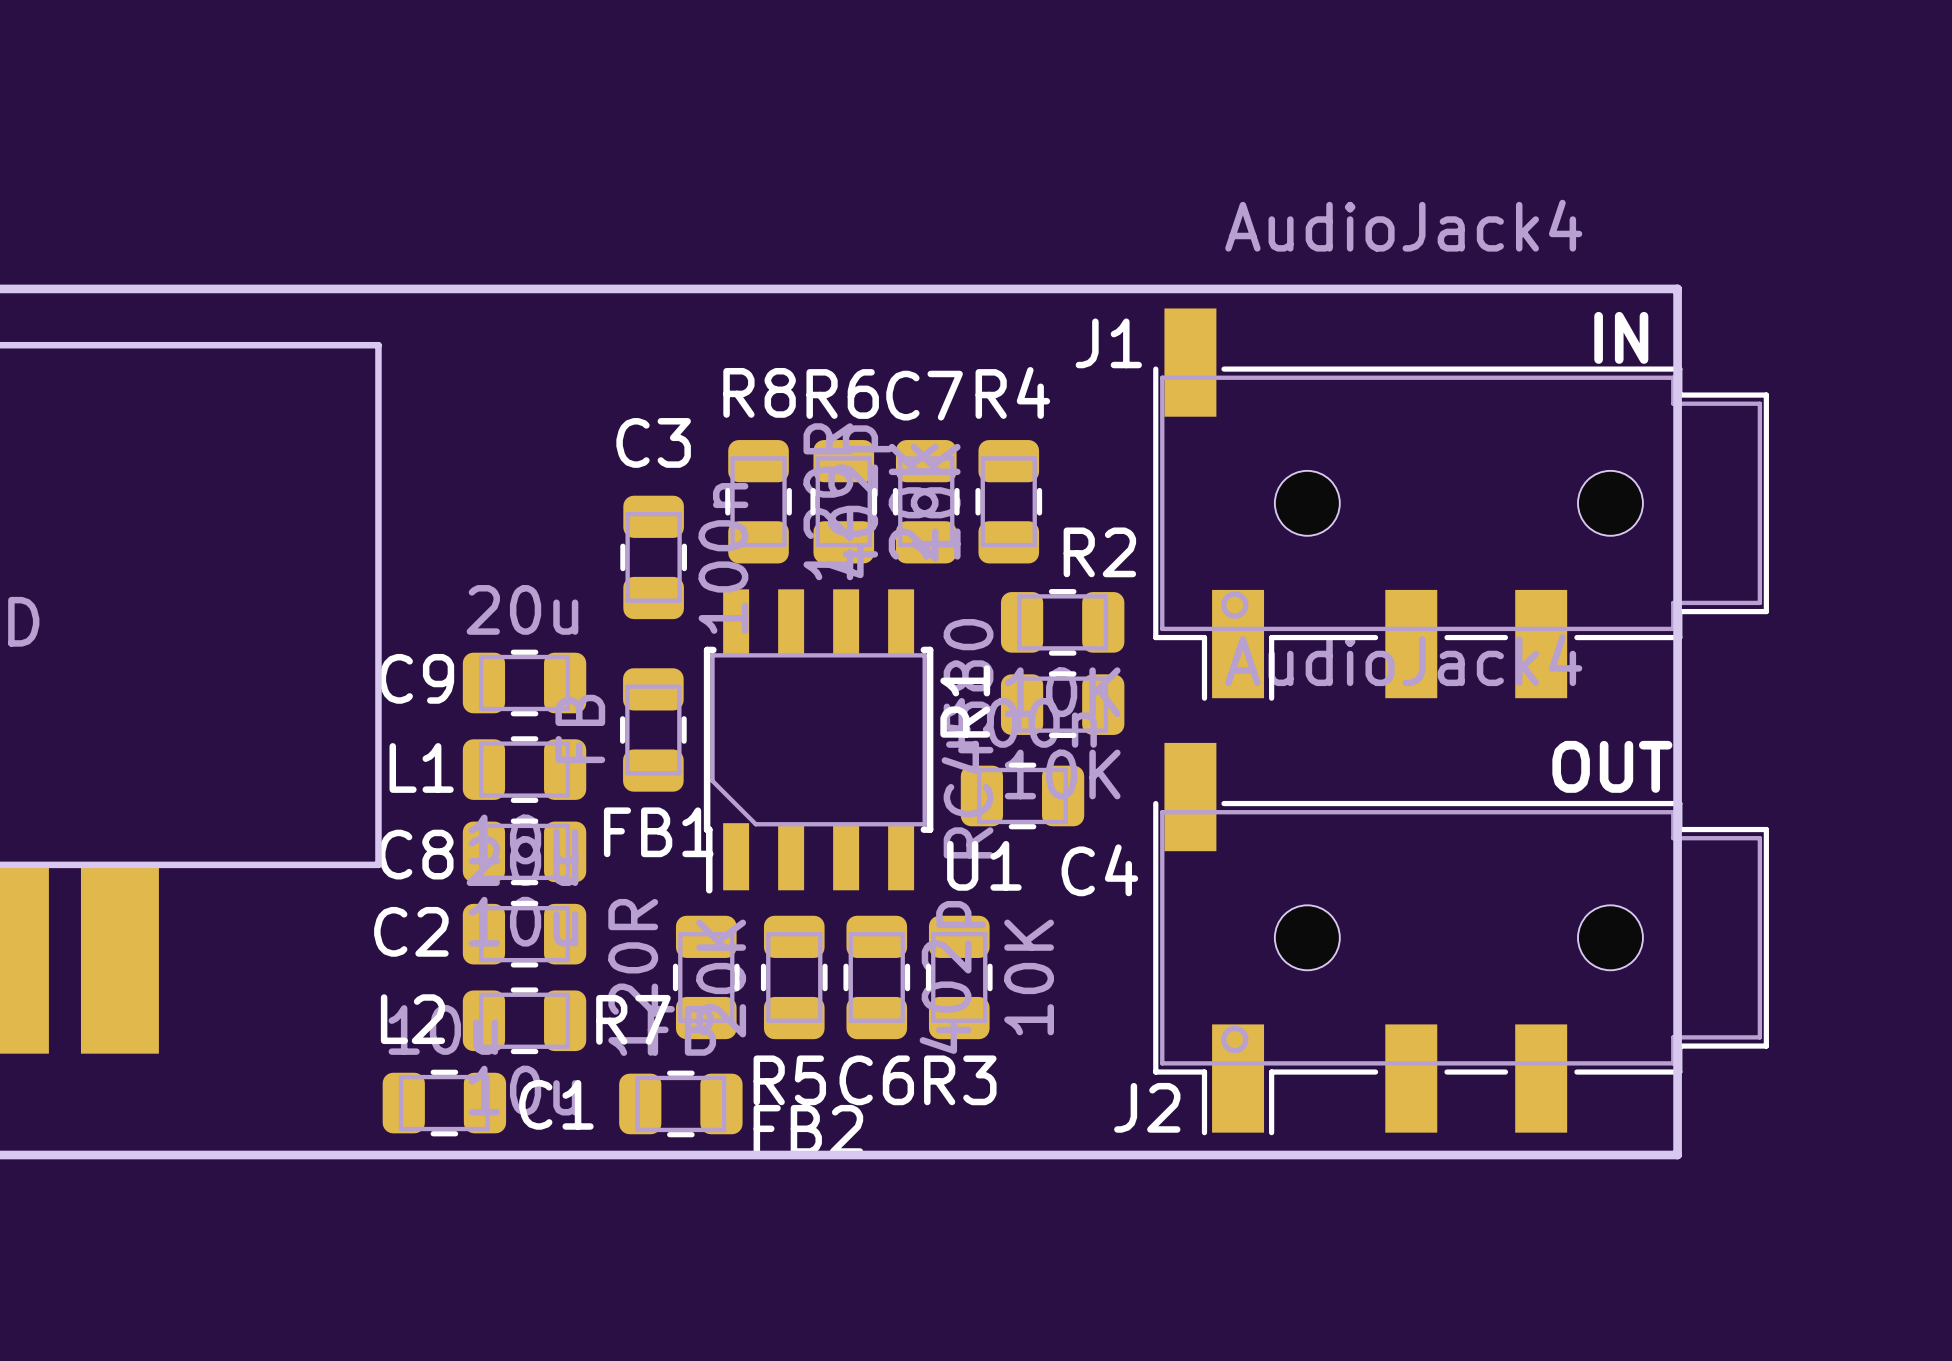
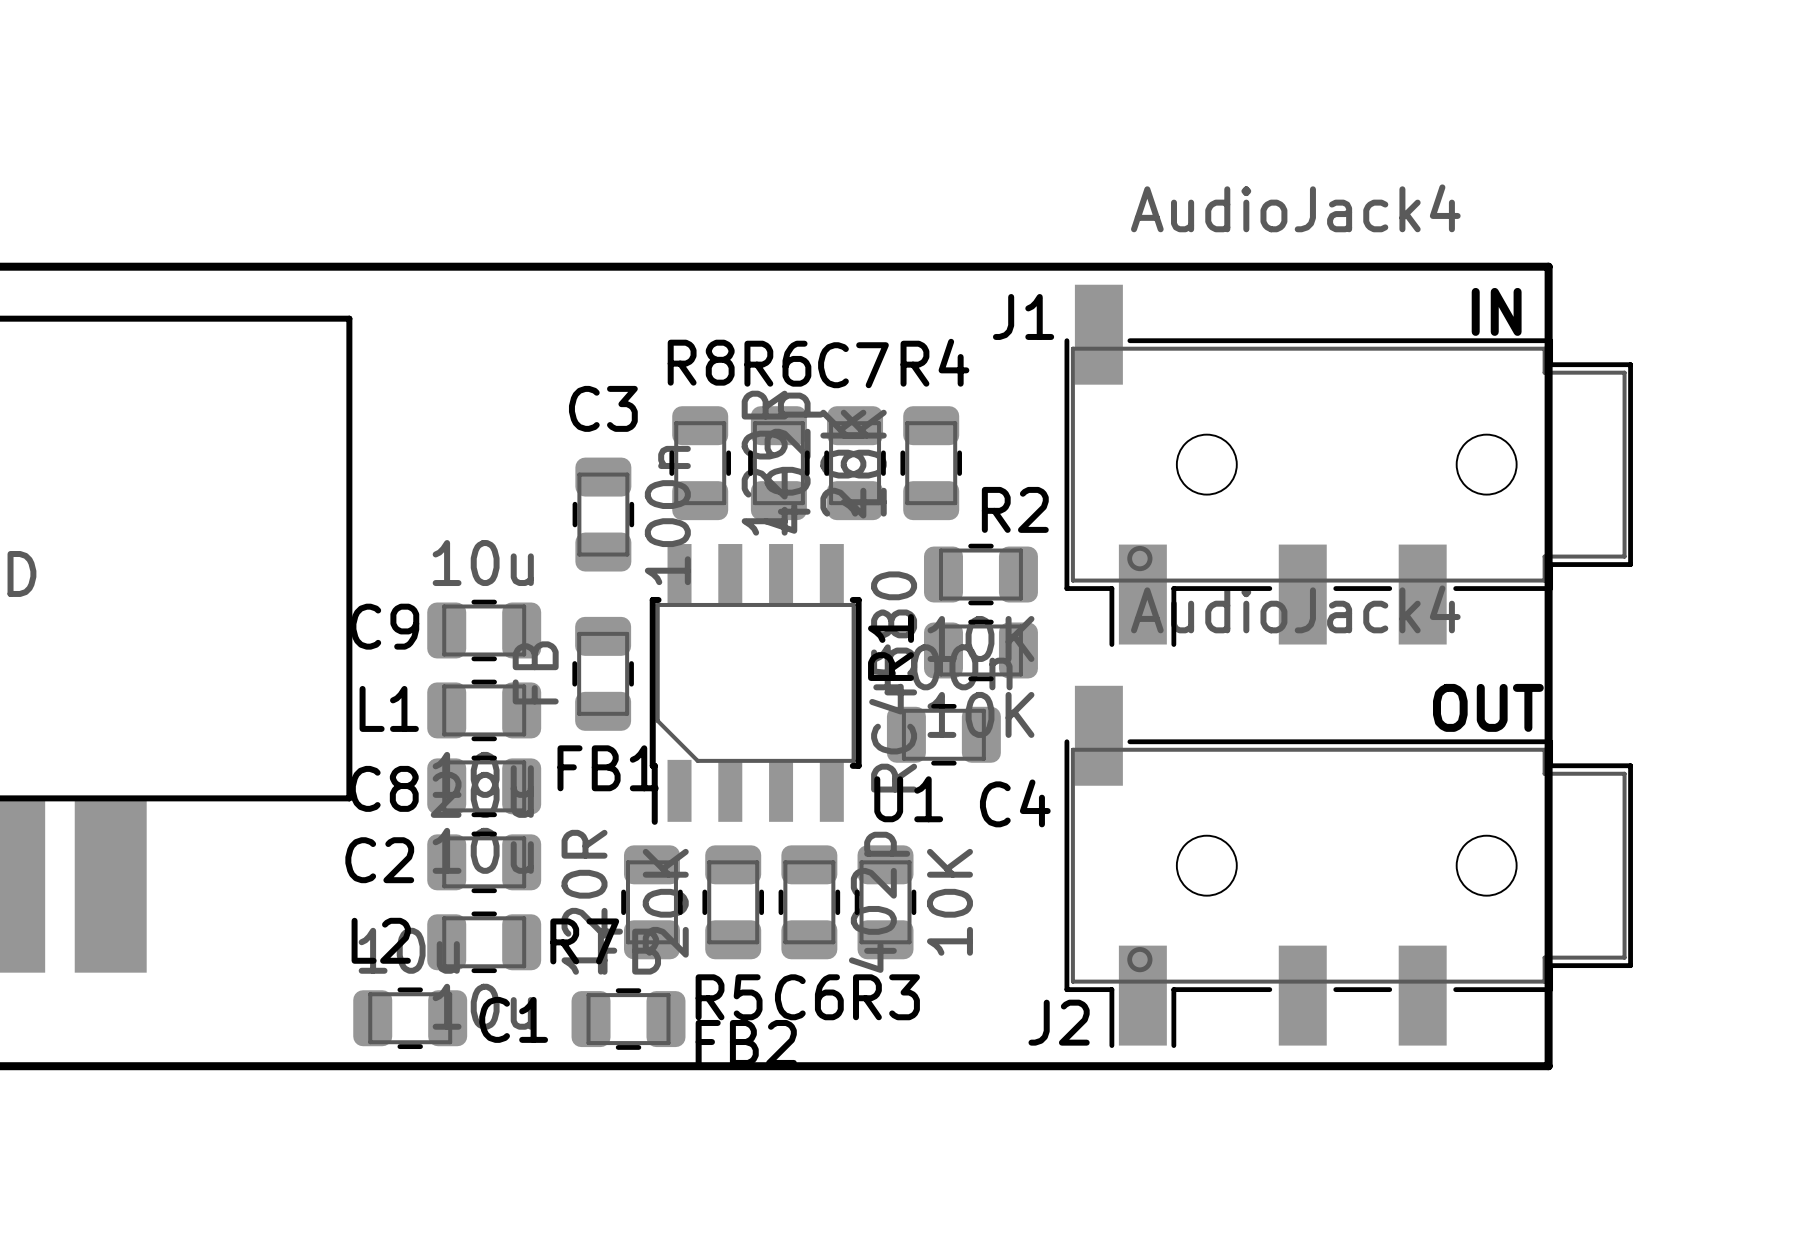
C9 value: 20u (522, 609) -> 10u (483, 563)

